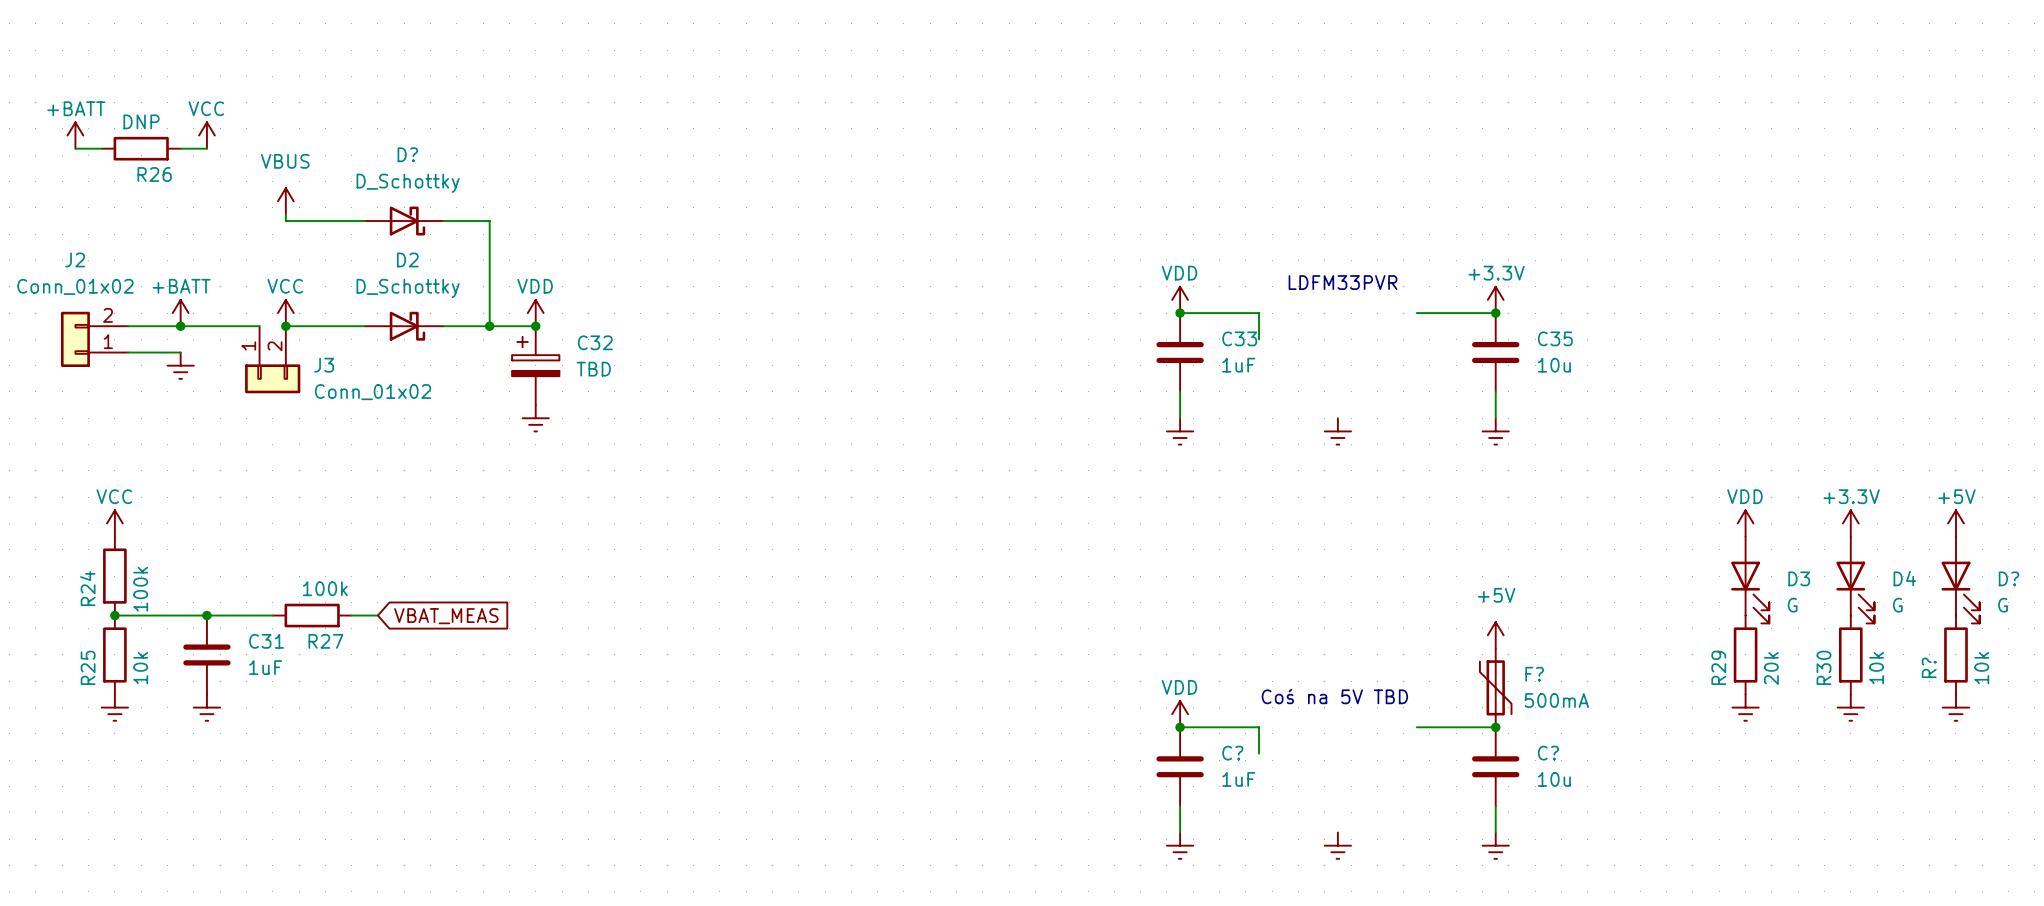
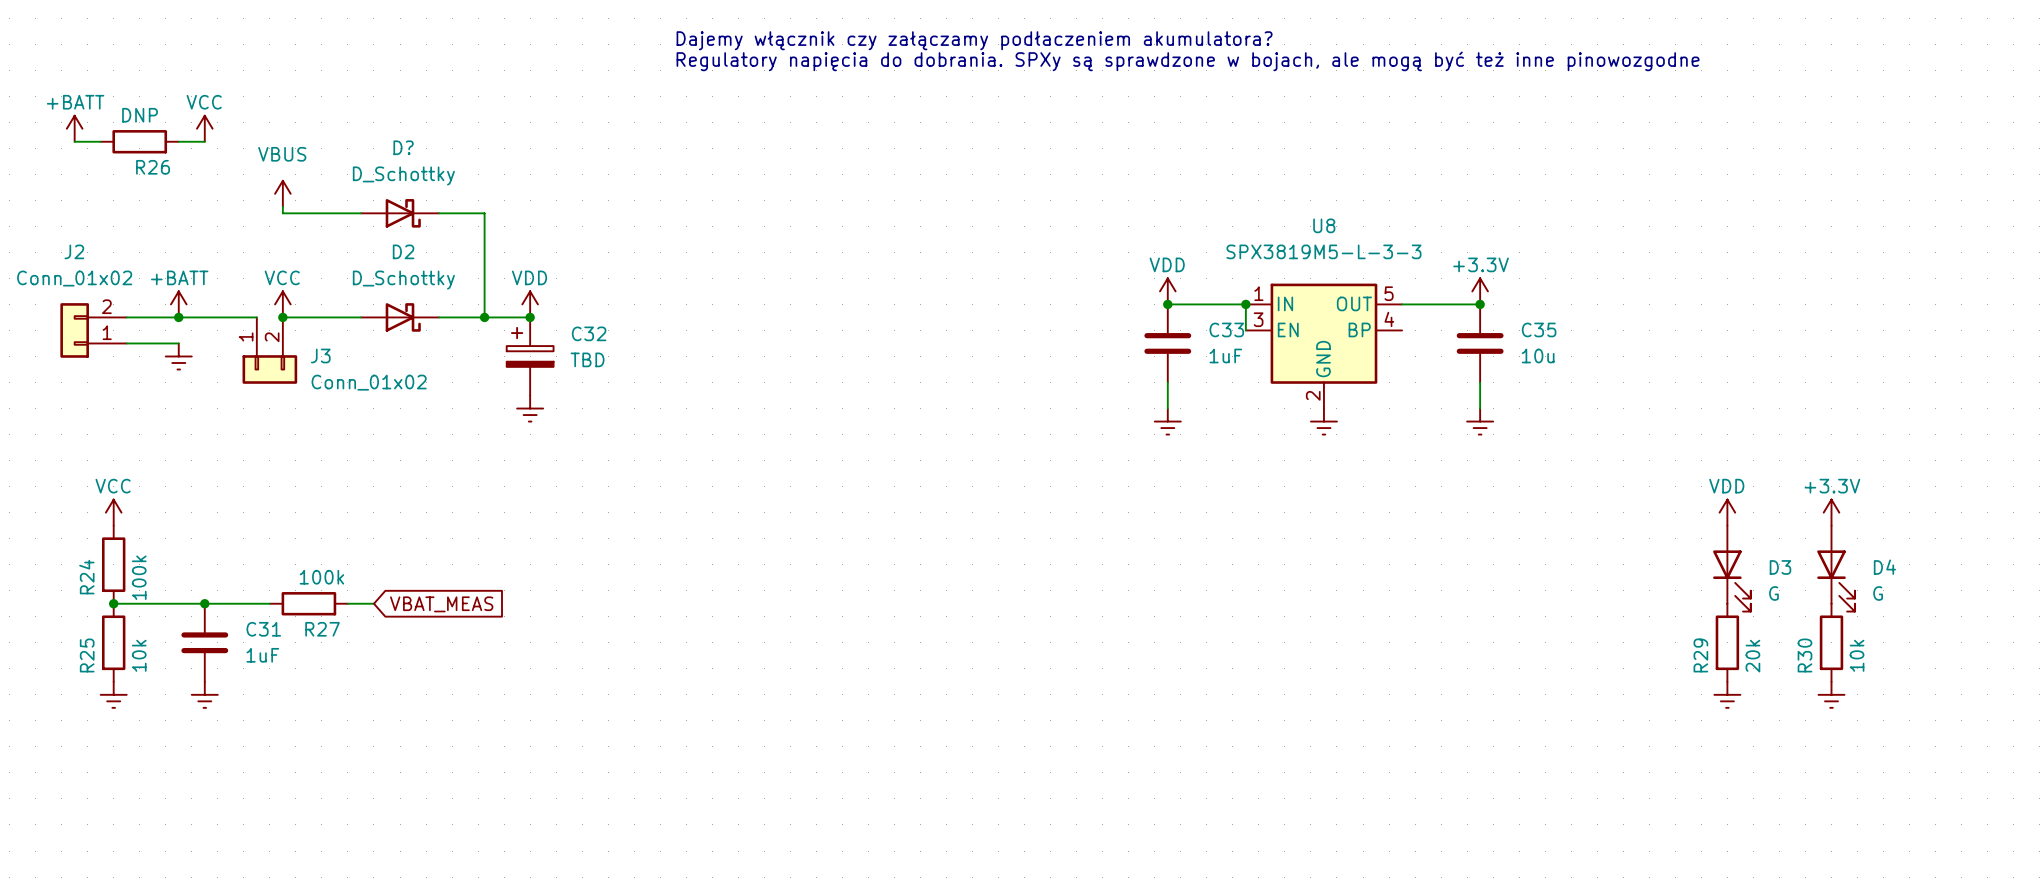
text: none -> Dajemy włącznik czy załączamy podłaczeniem akumulatora? (974, 40)
text: none -> Regulatory napięcia do dobrania. SPXy są sprawdzone w bojach, ale mogą być też inne pinowozgodne (1188, 61)
text: LDFM33PVR (1343, 282) -> none
junction: none -> (1245, 304)
U8: none -> SPX3819M5-L-3-3 (1323, 346)
power symbol: +5V (1955, 523) -> none
D?: G (1960, 580) -> none
power symbol: +5V (1495, 635) -> none
R?: 10k (1955, 654) -> none
F?: 500mA (1495, 687) -> none
text: Coś na 5V TBD (1334, 696) -> none
power symbol: (1955, 707) -> none
power symbol: VDD (1180, 714) -> none
wire: (1180, 727) (1259, 727) (1259, 753) -> none
junction: (1180, 727) -> none
wire: (1416, 727) (1495, 727) -> none
junction: (1495, 727) -> none
C?: 1uF (1180, 766) -> none
C?: 10u (1495, 766) -> none
wire: (1180, 806) (1180, 832) -> none
wire: (1495, 806) (1495, 832) -> none
power symbol: (1180, 845) -> none
power symbol: (1337, 845) -> none
power symbol: (1495, 845) -> none

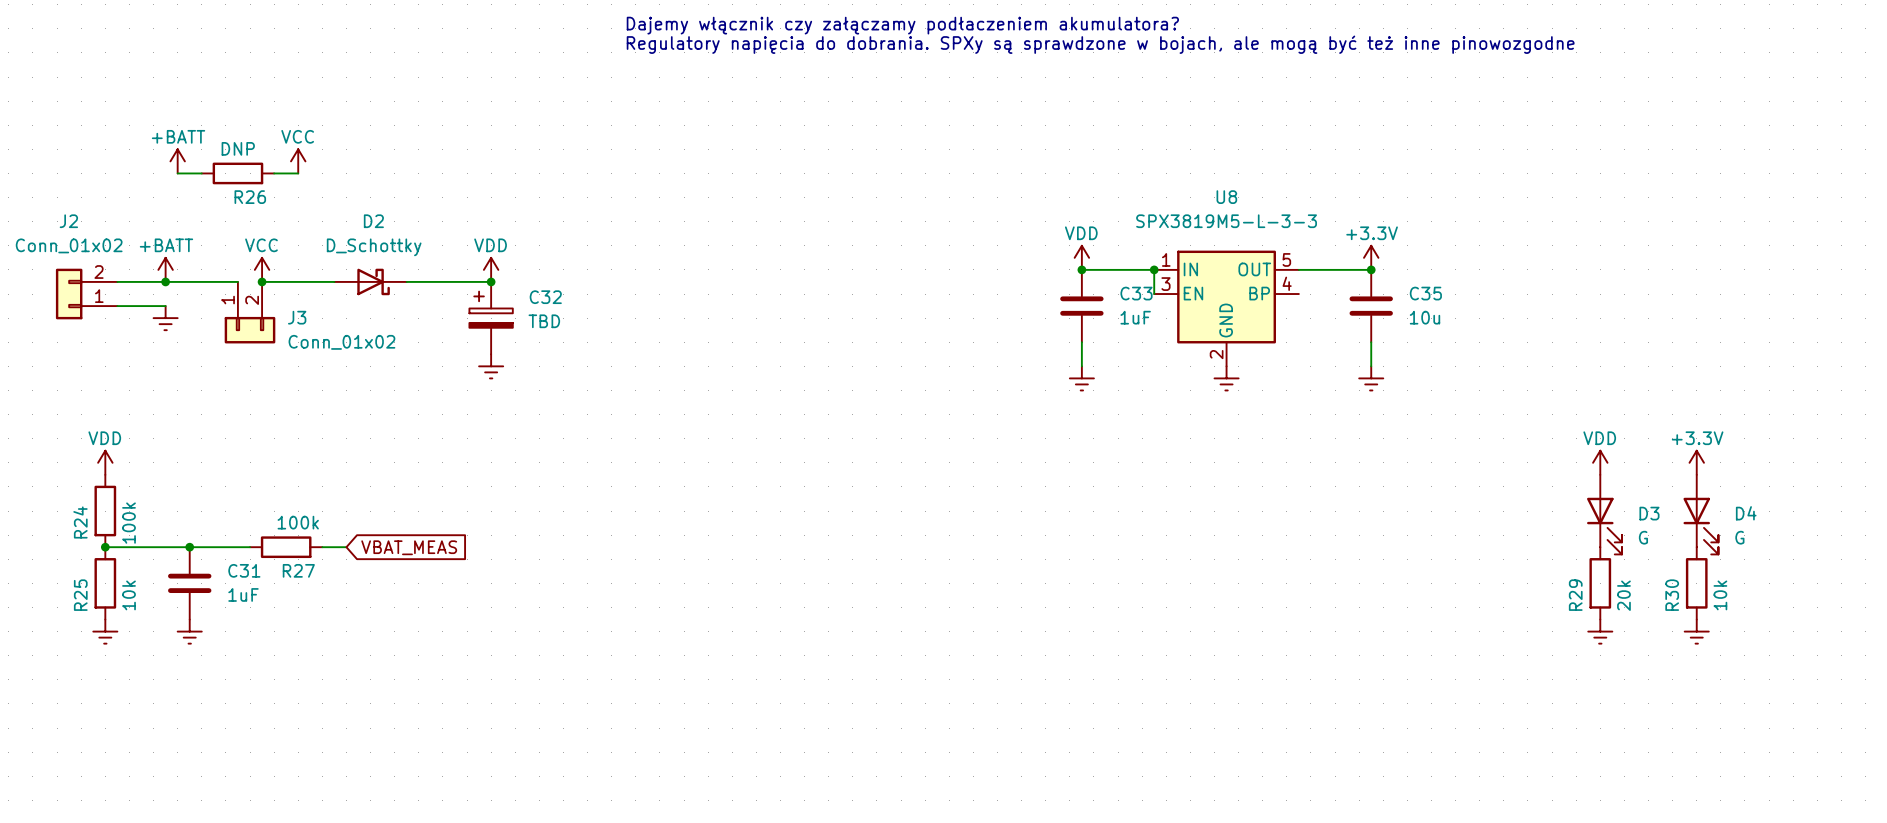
power symbol position: +BATT (74, 128) -> +BATT (177, 161)
power symbol position: VCC (204, 128) -> VCC (298, 161)
wire: (74, 141) (100, 141) -> (177, 173) (201, 173)
R26 position: (139, 141) -> (237, 173)
wire: (178, 141) (204, 141) -> (274, 173) (298, 173)
power symbol: VBUS (282, 193) -> none
wire: (282, 206) (282, 213) (360, 213) -> none
D?: D_Schottky (400, 213) -> none
wire: (439, 213) (484, 213) (484, 317) -> none
junction: (484, 317) -> none
power symbol: VCC (113, 512) -> VDD (105, 462)

